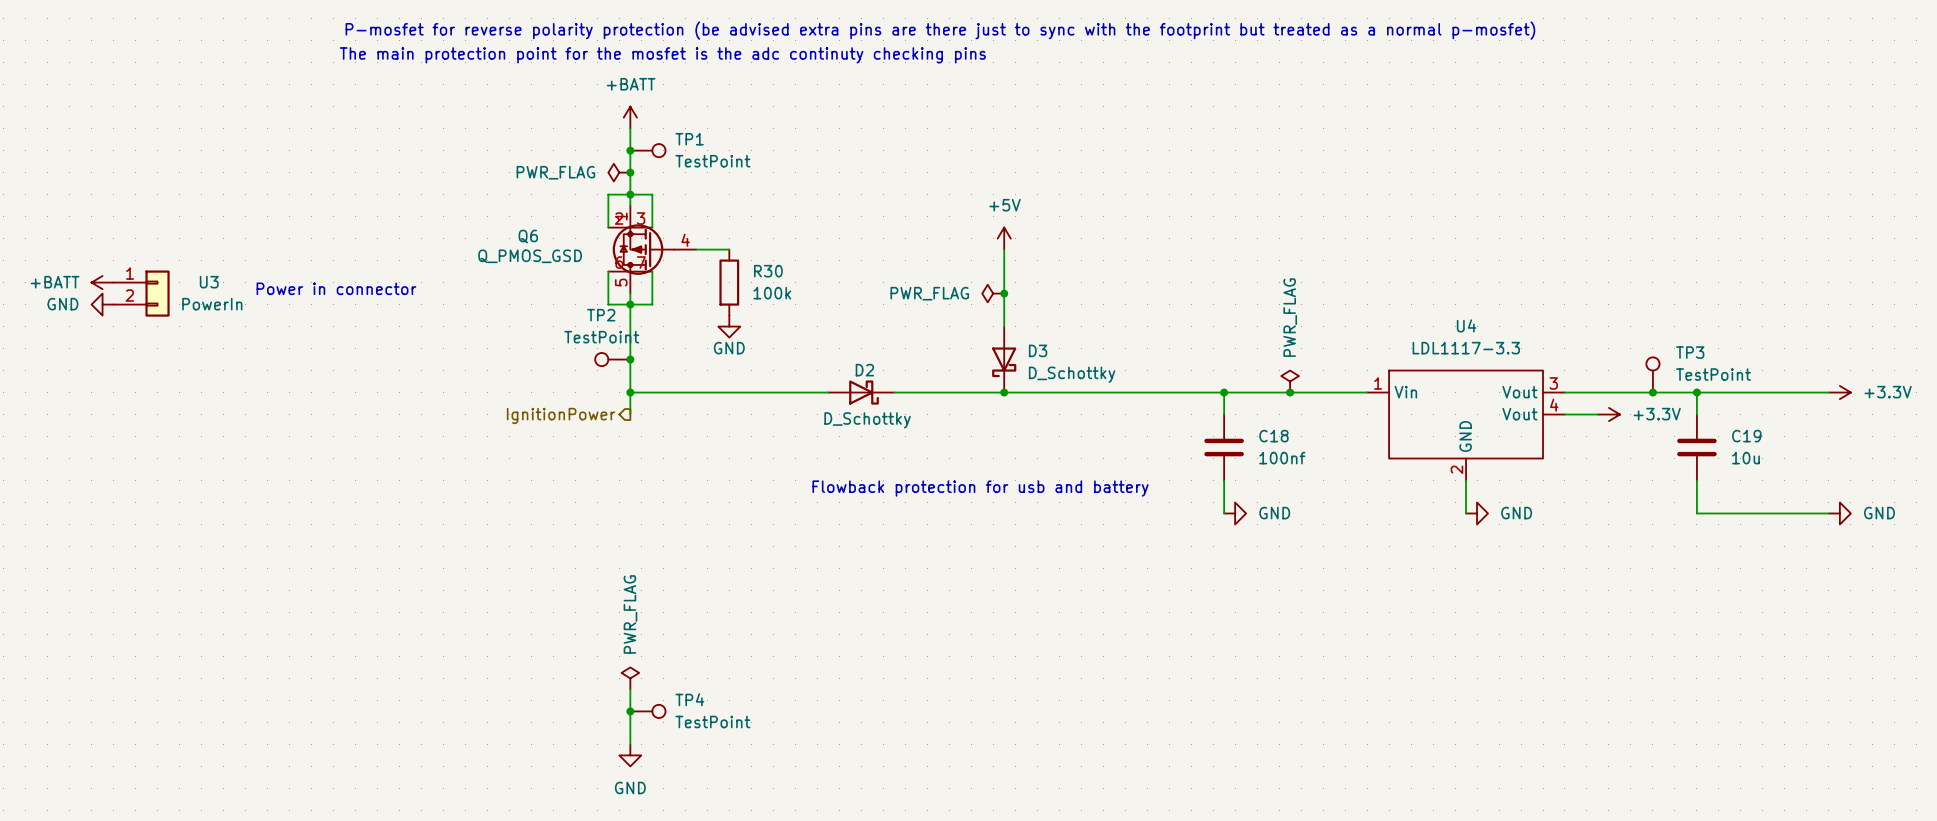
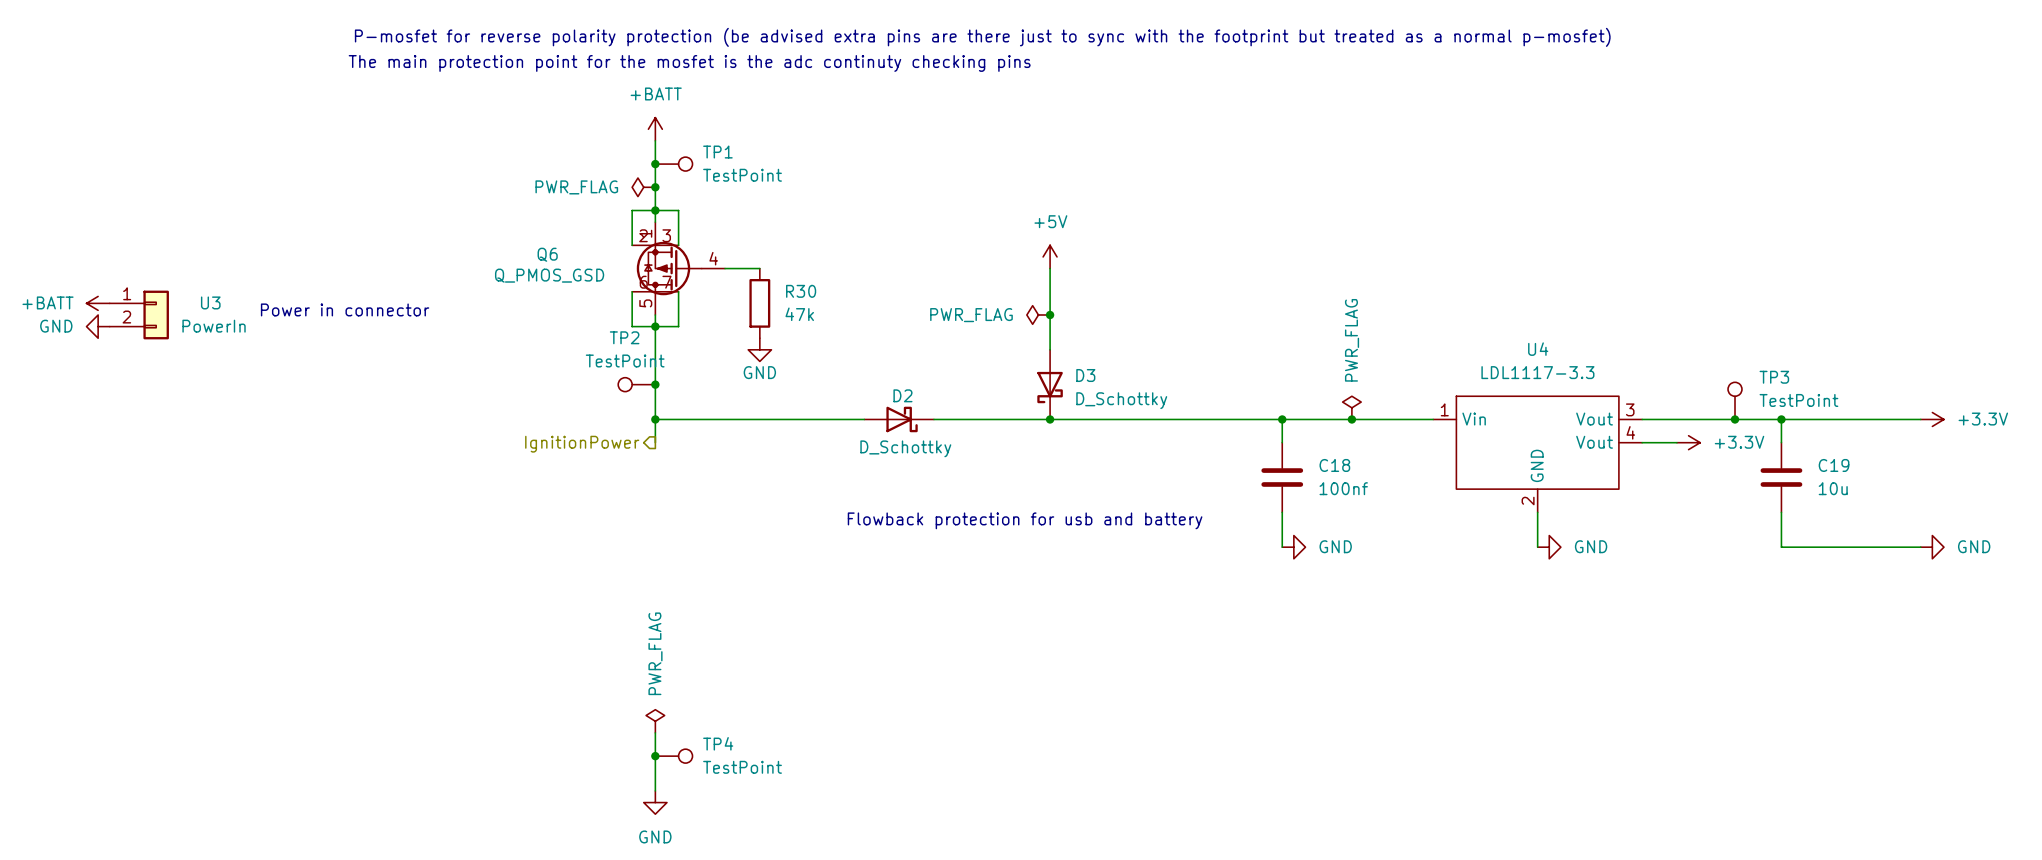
R30 value: 100k (772, 293) -> 47k (799, 314)

